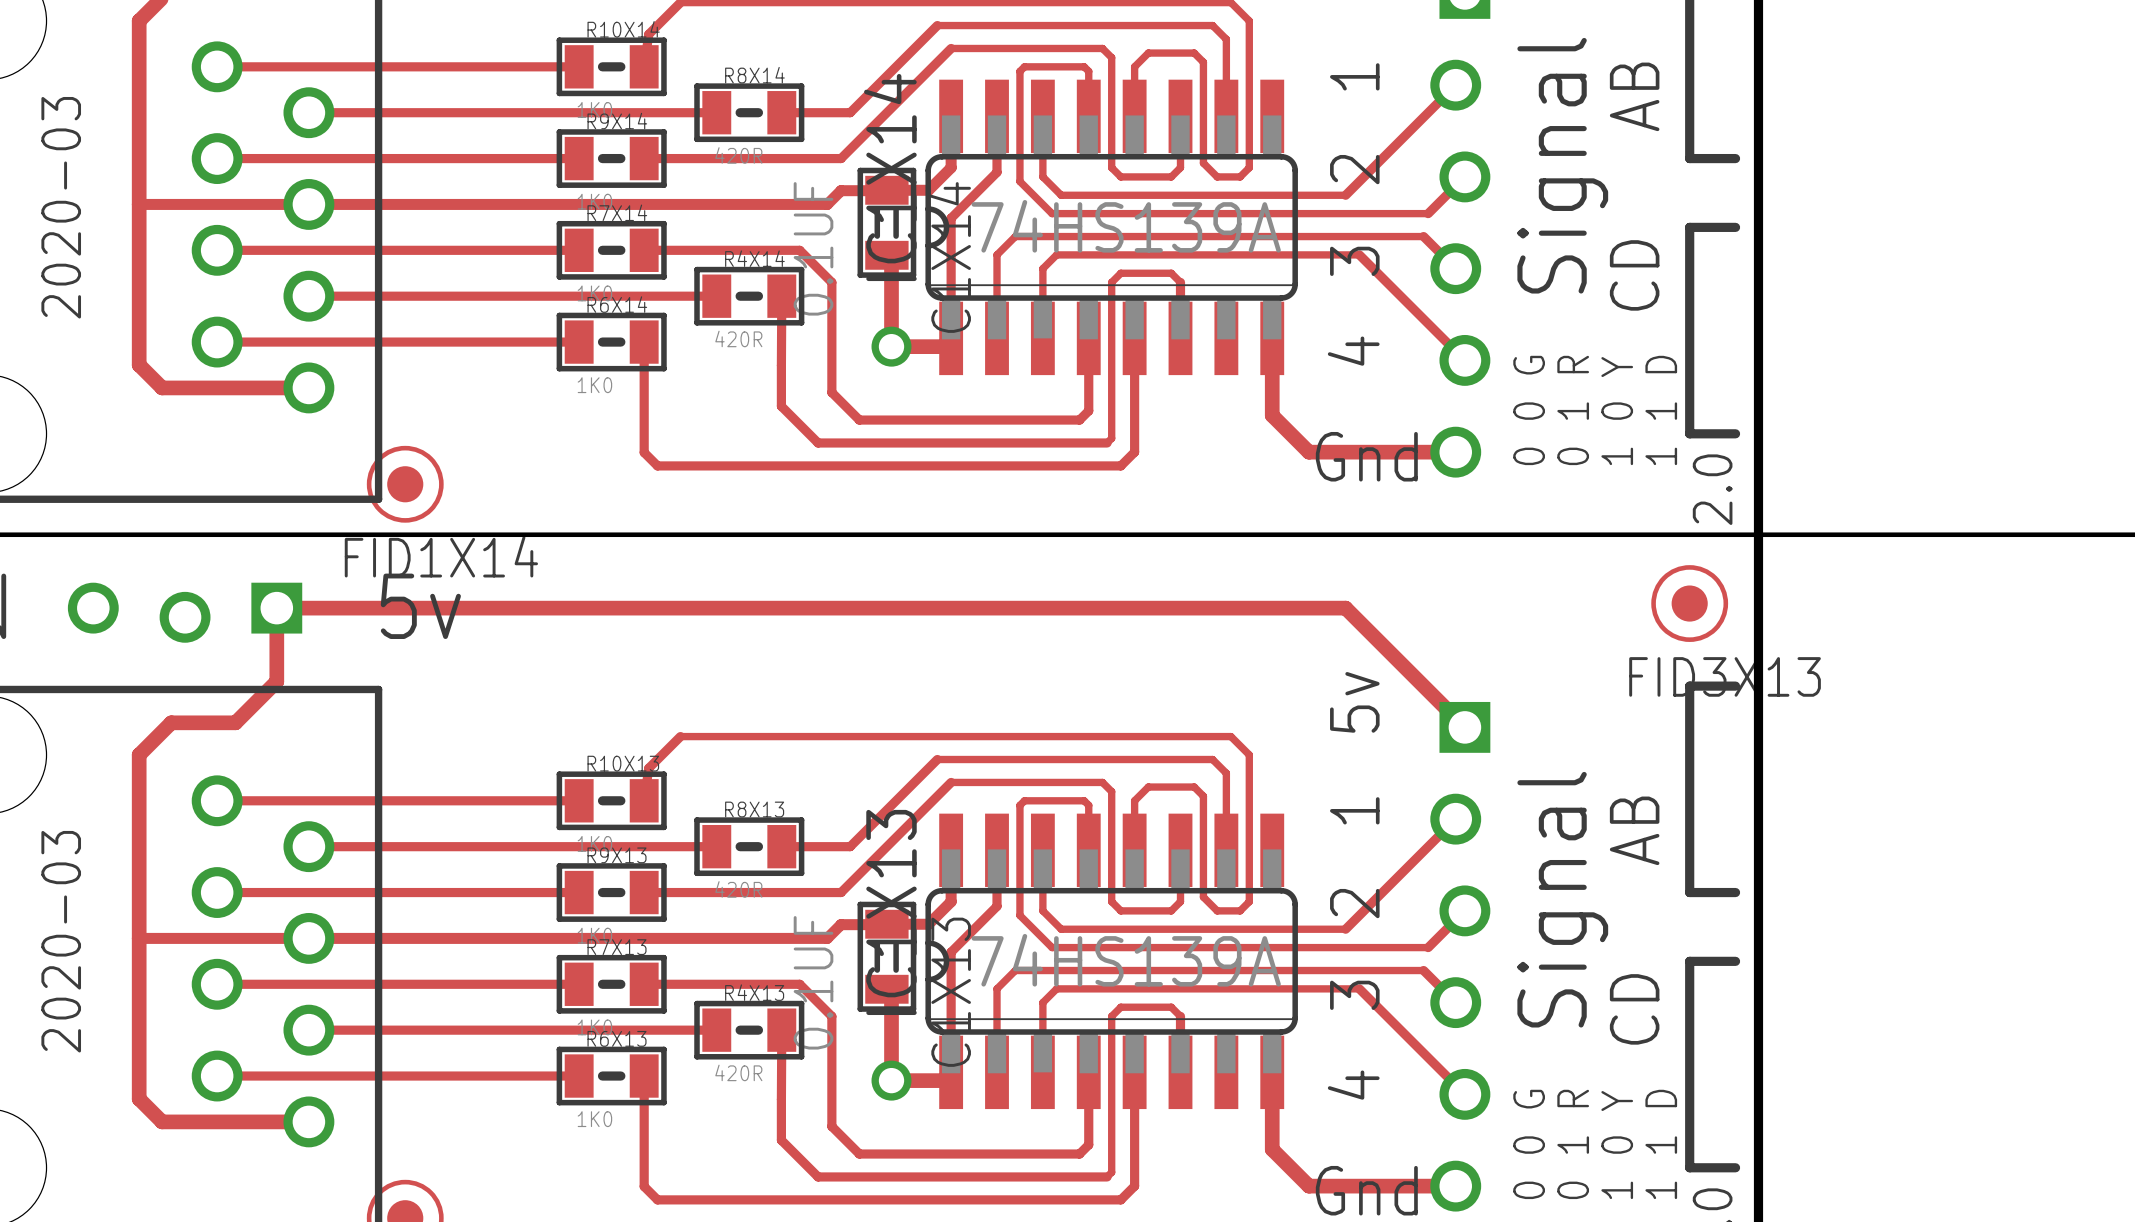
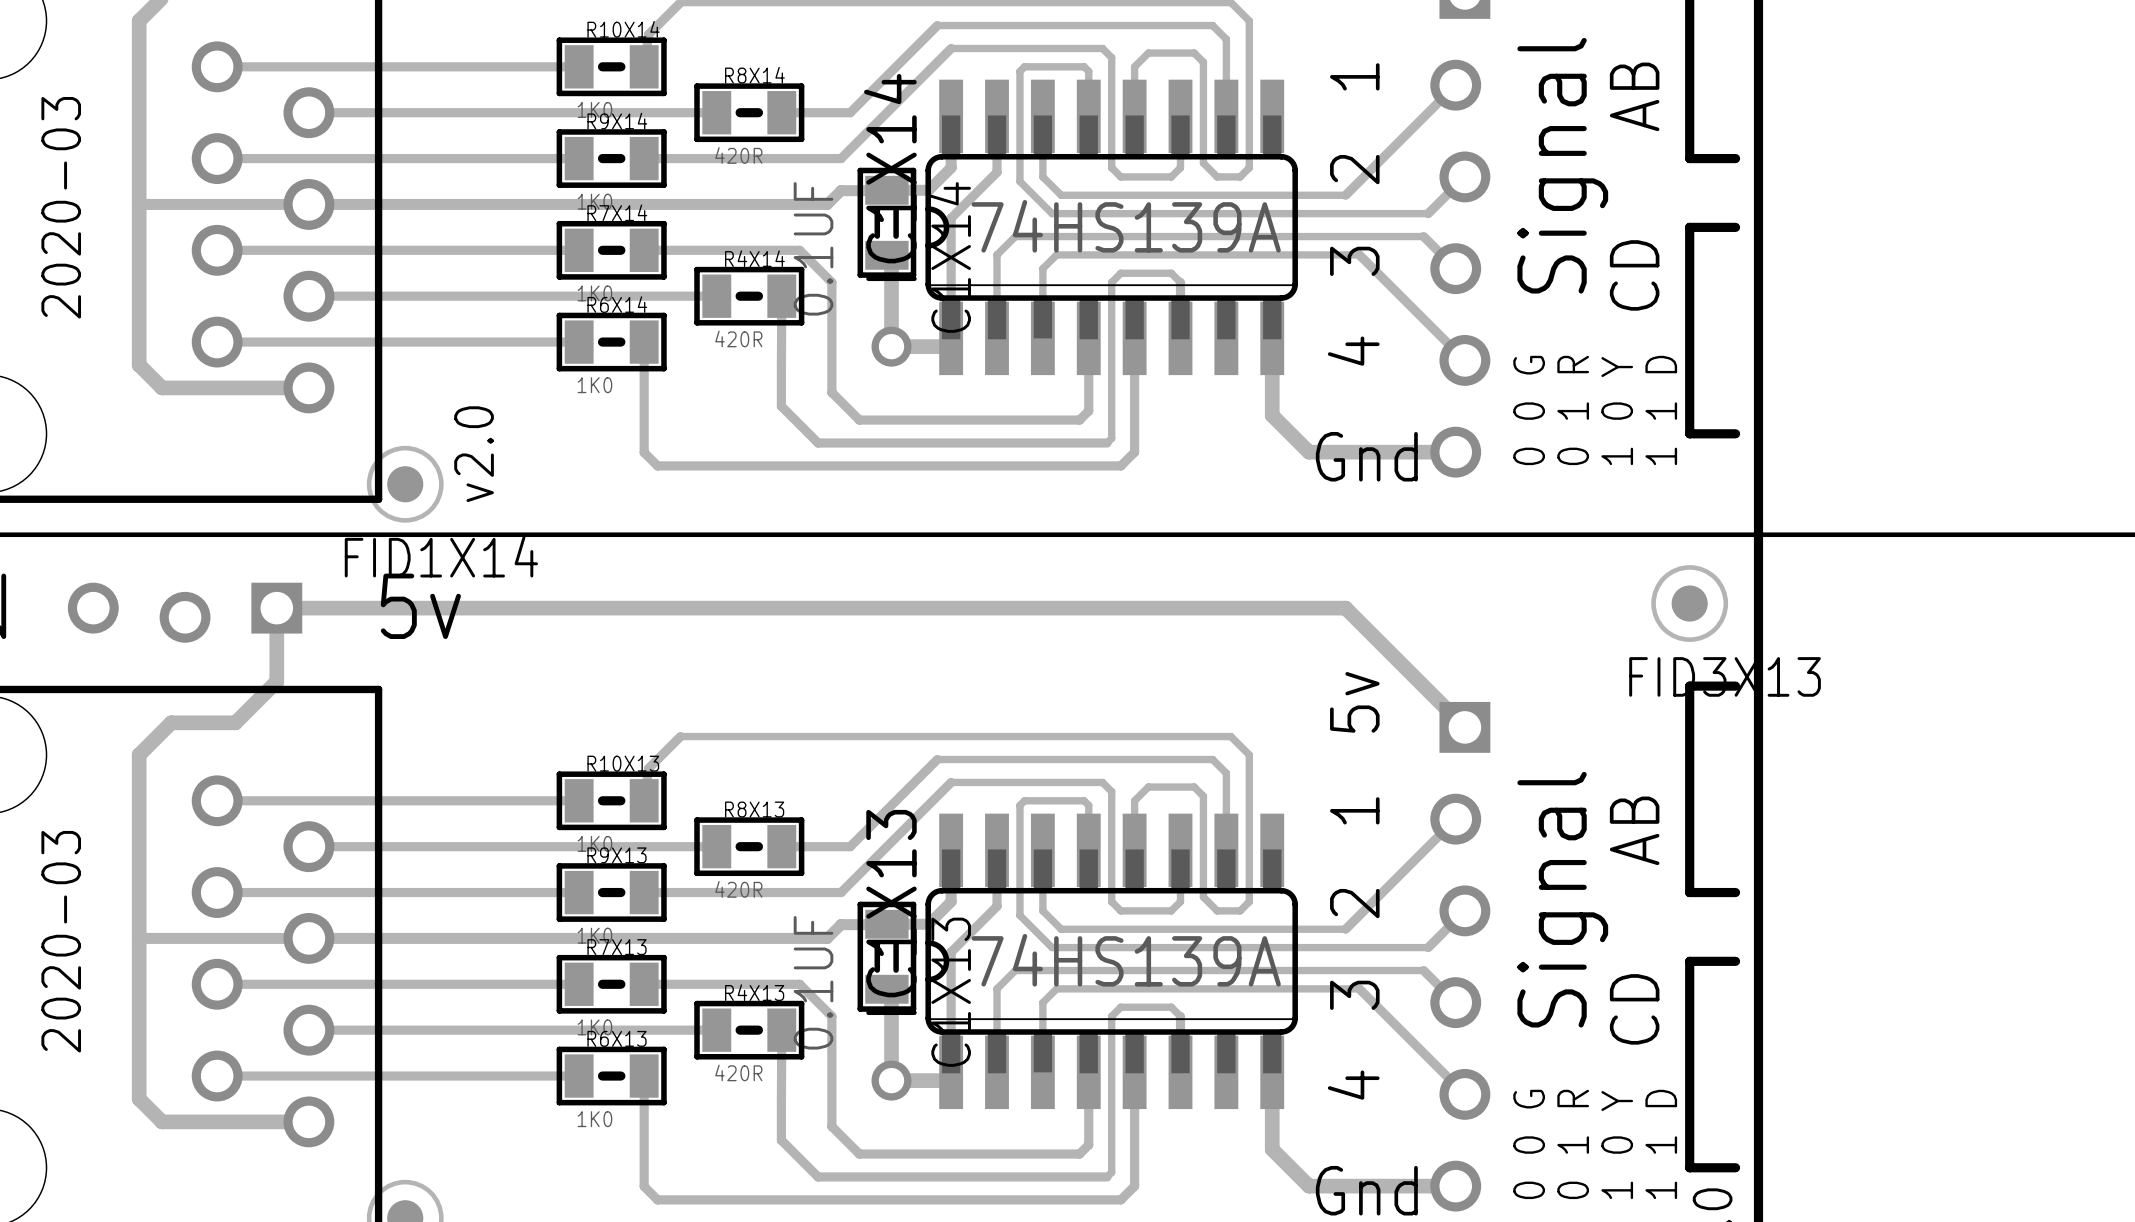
text: none -> v2.0 (474, 454)
text: 2.0 (1712, 489) -> none

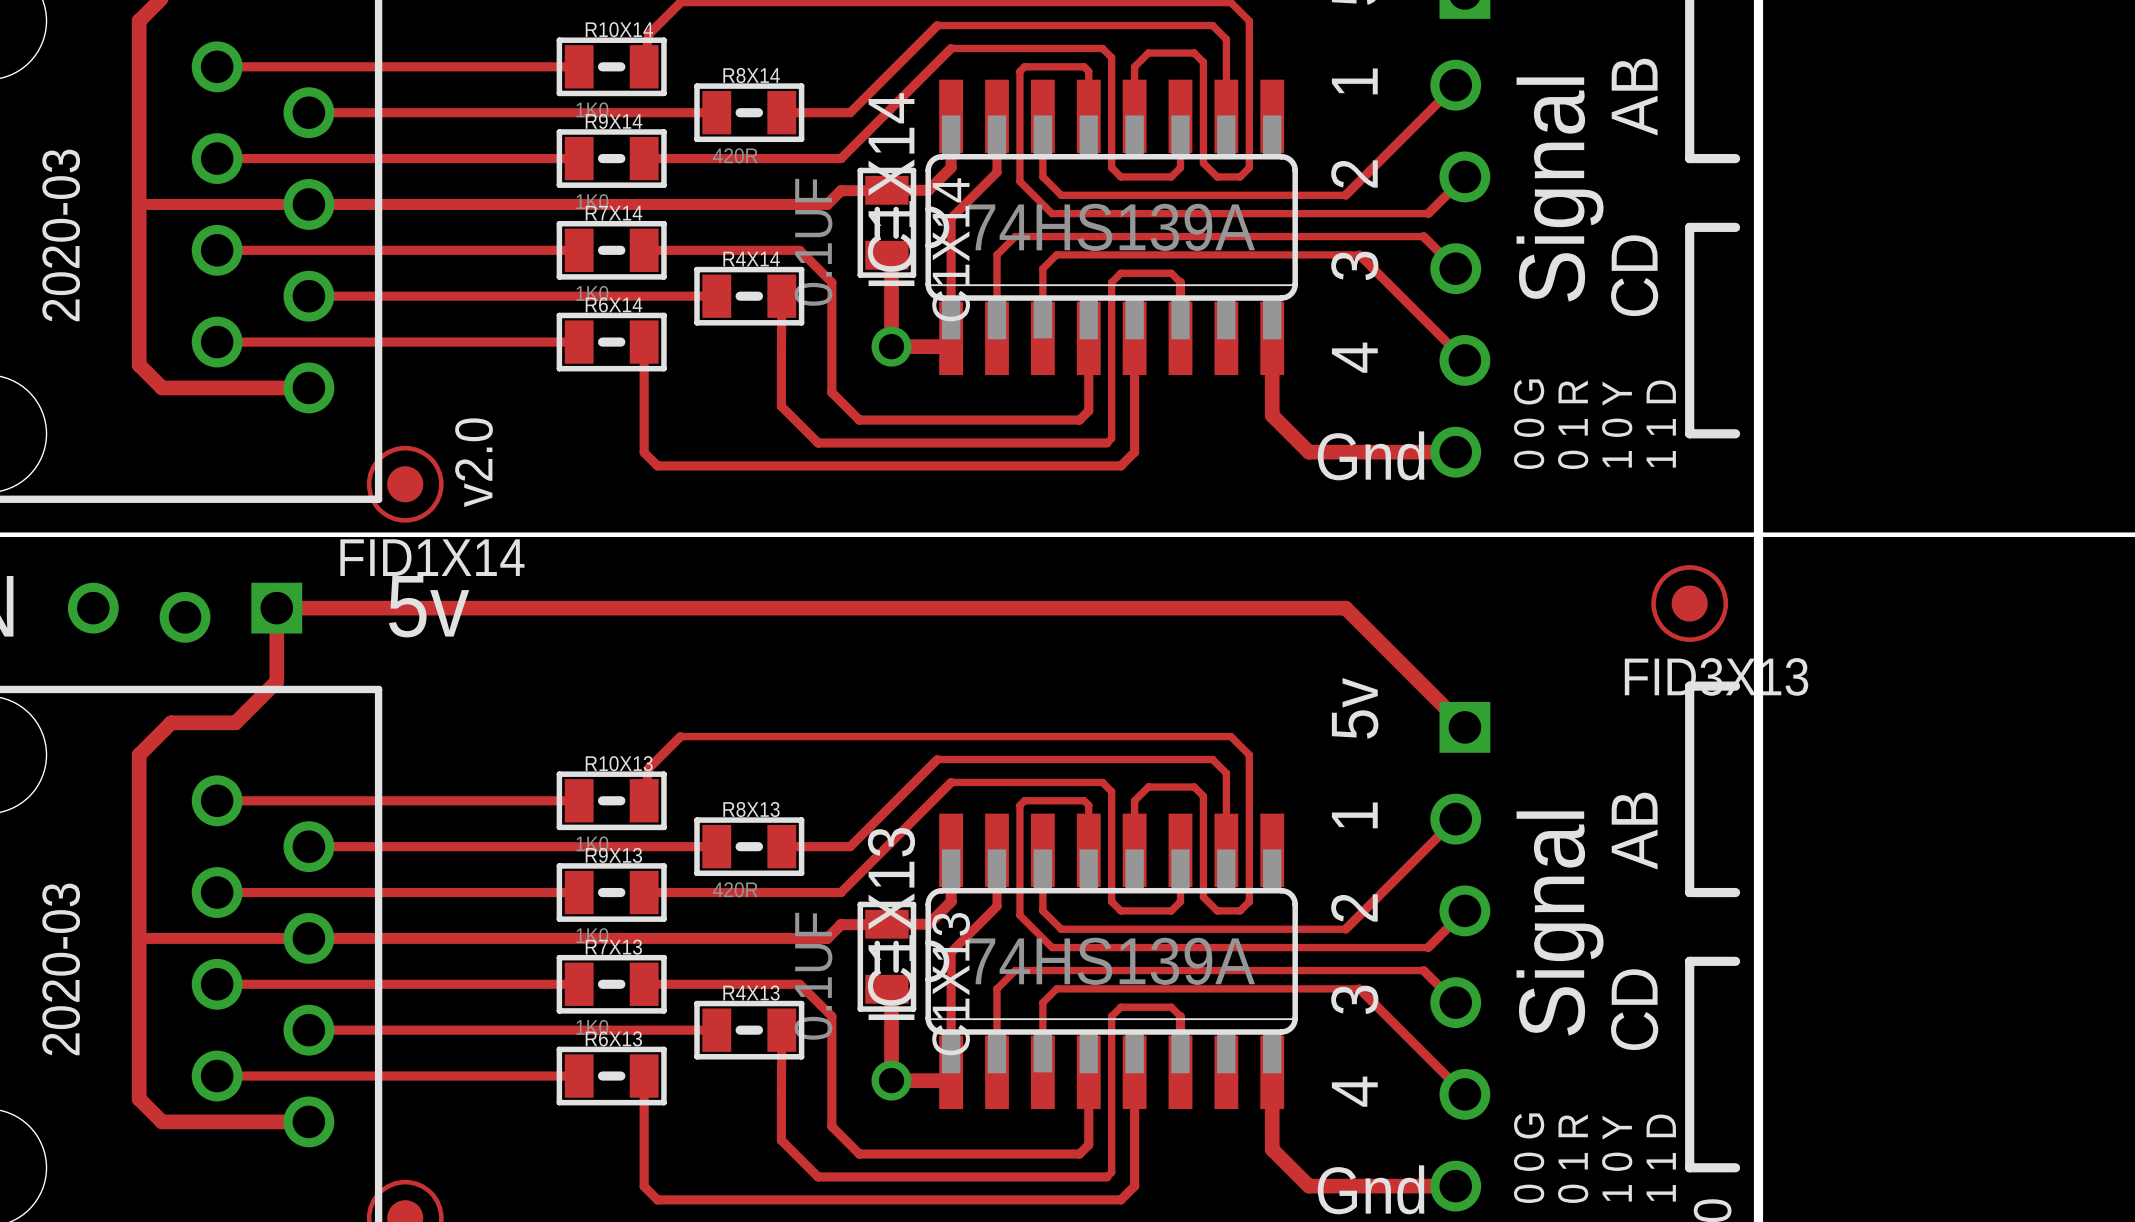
R4X14 value: 420R (738, 338) -> none
R6X14 value: 1K0 (594, 385) -> none
R4X13 value: 420R (738, 1072) -> none
R6X13 value: 1K0 (594, 1119) -> none

